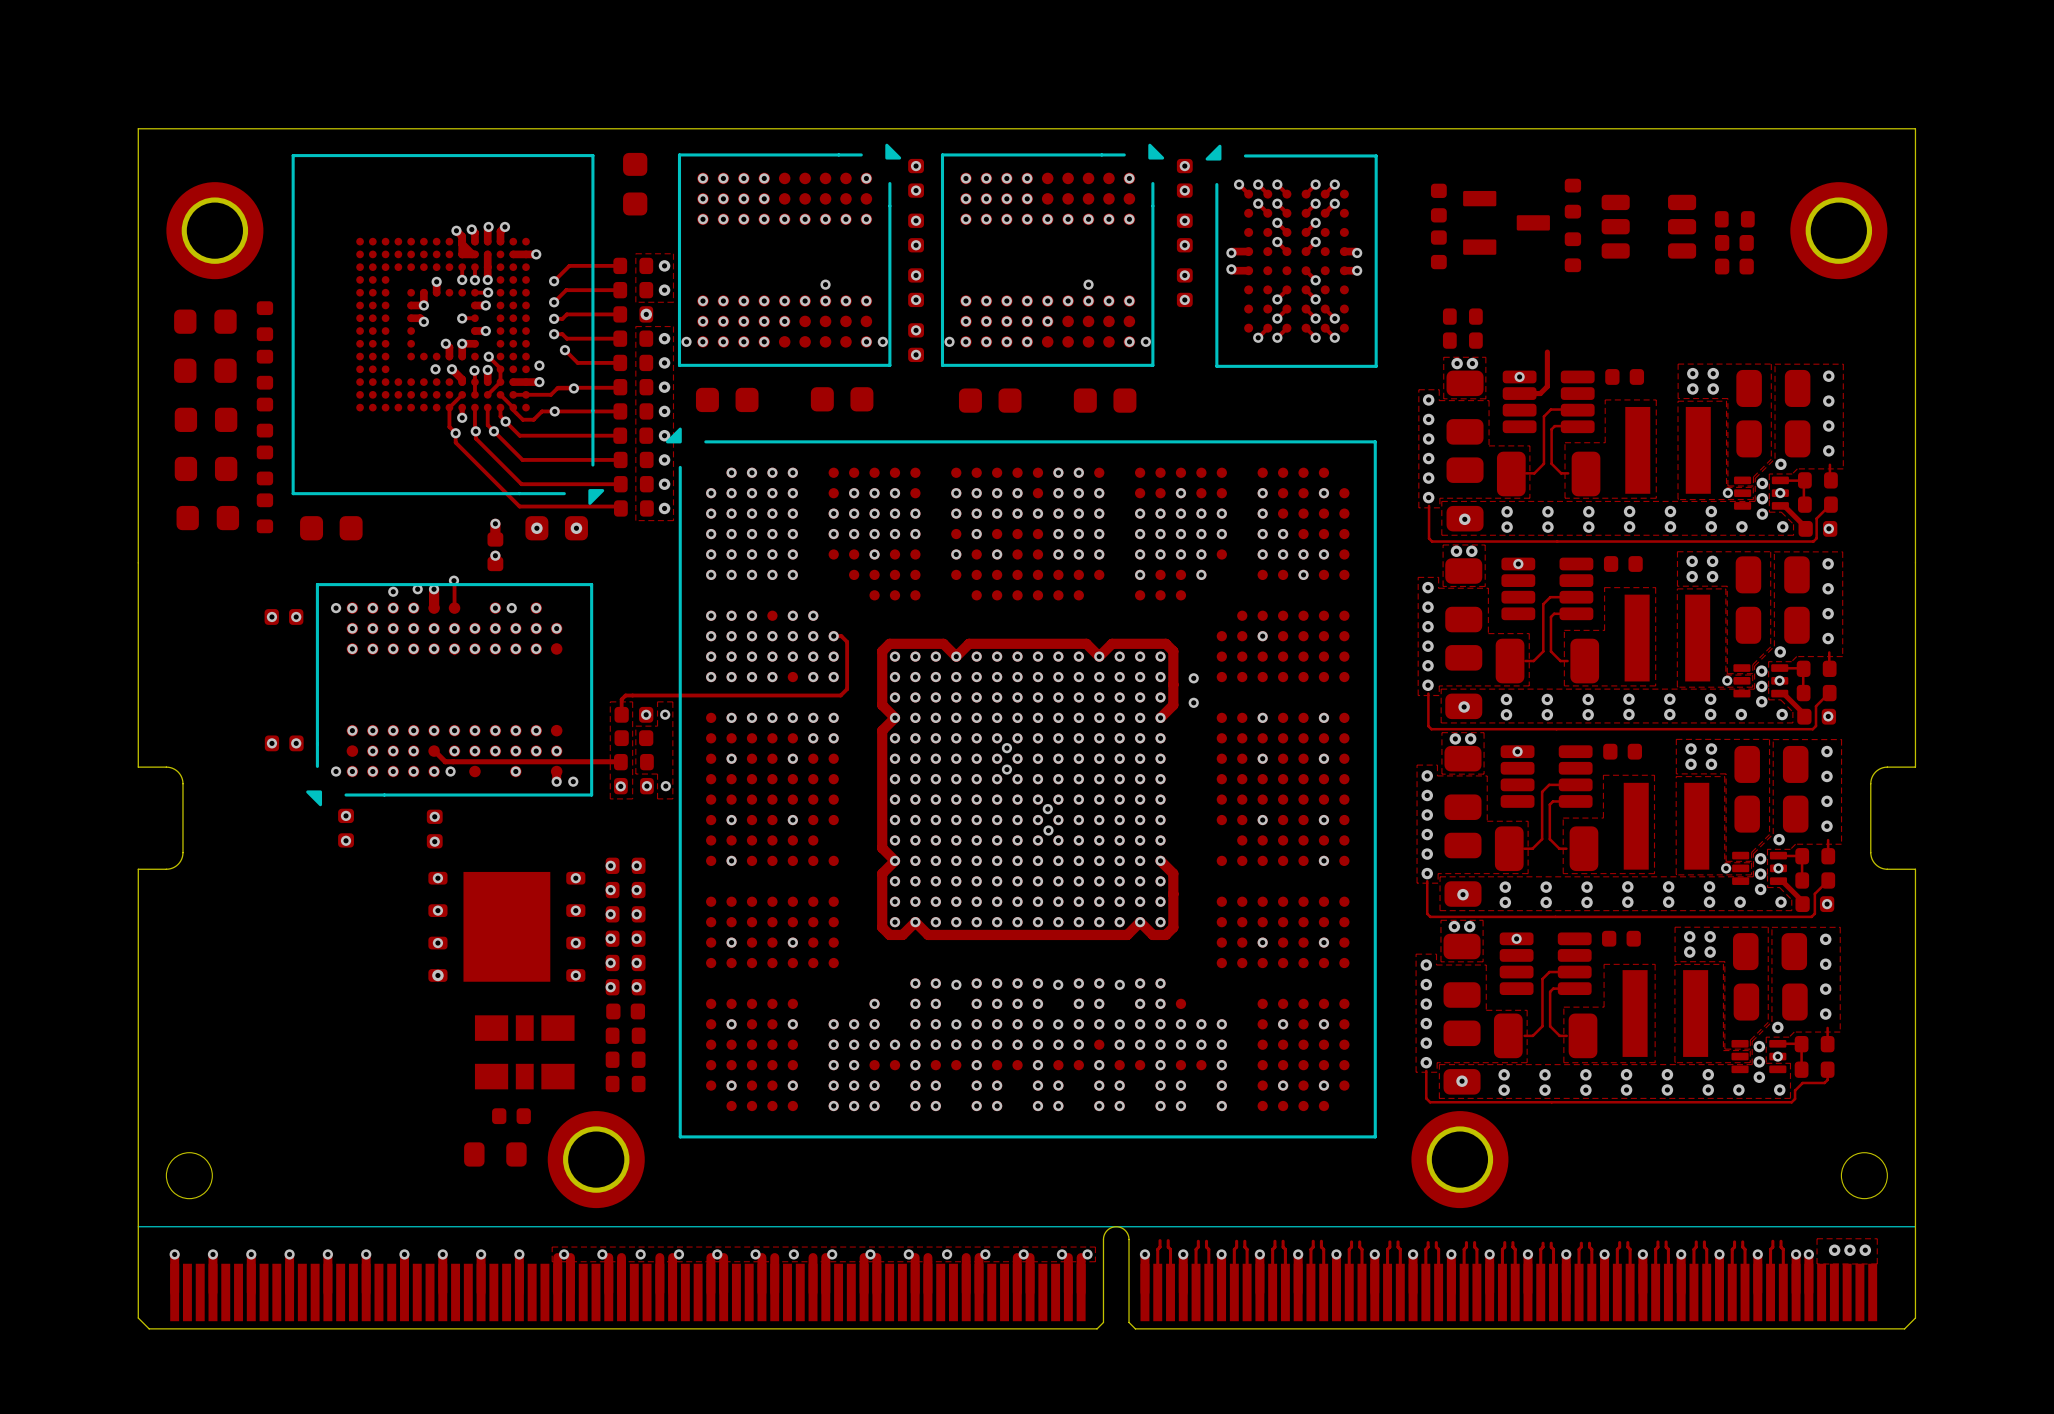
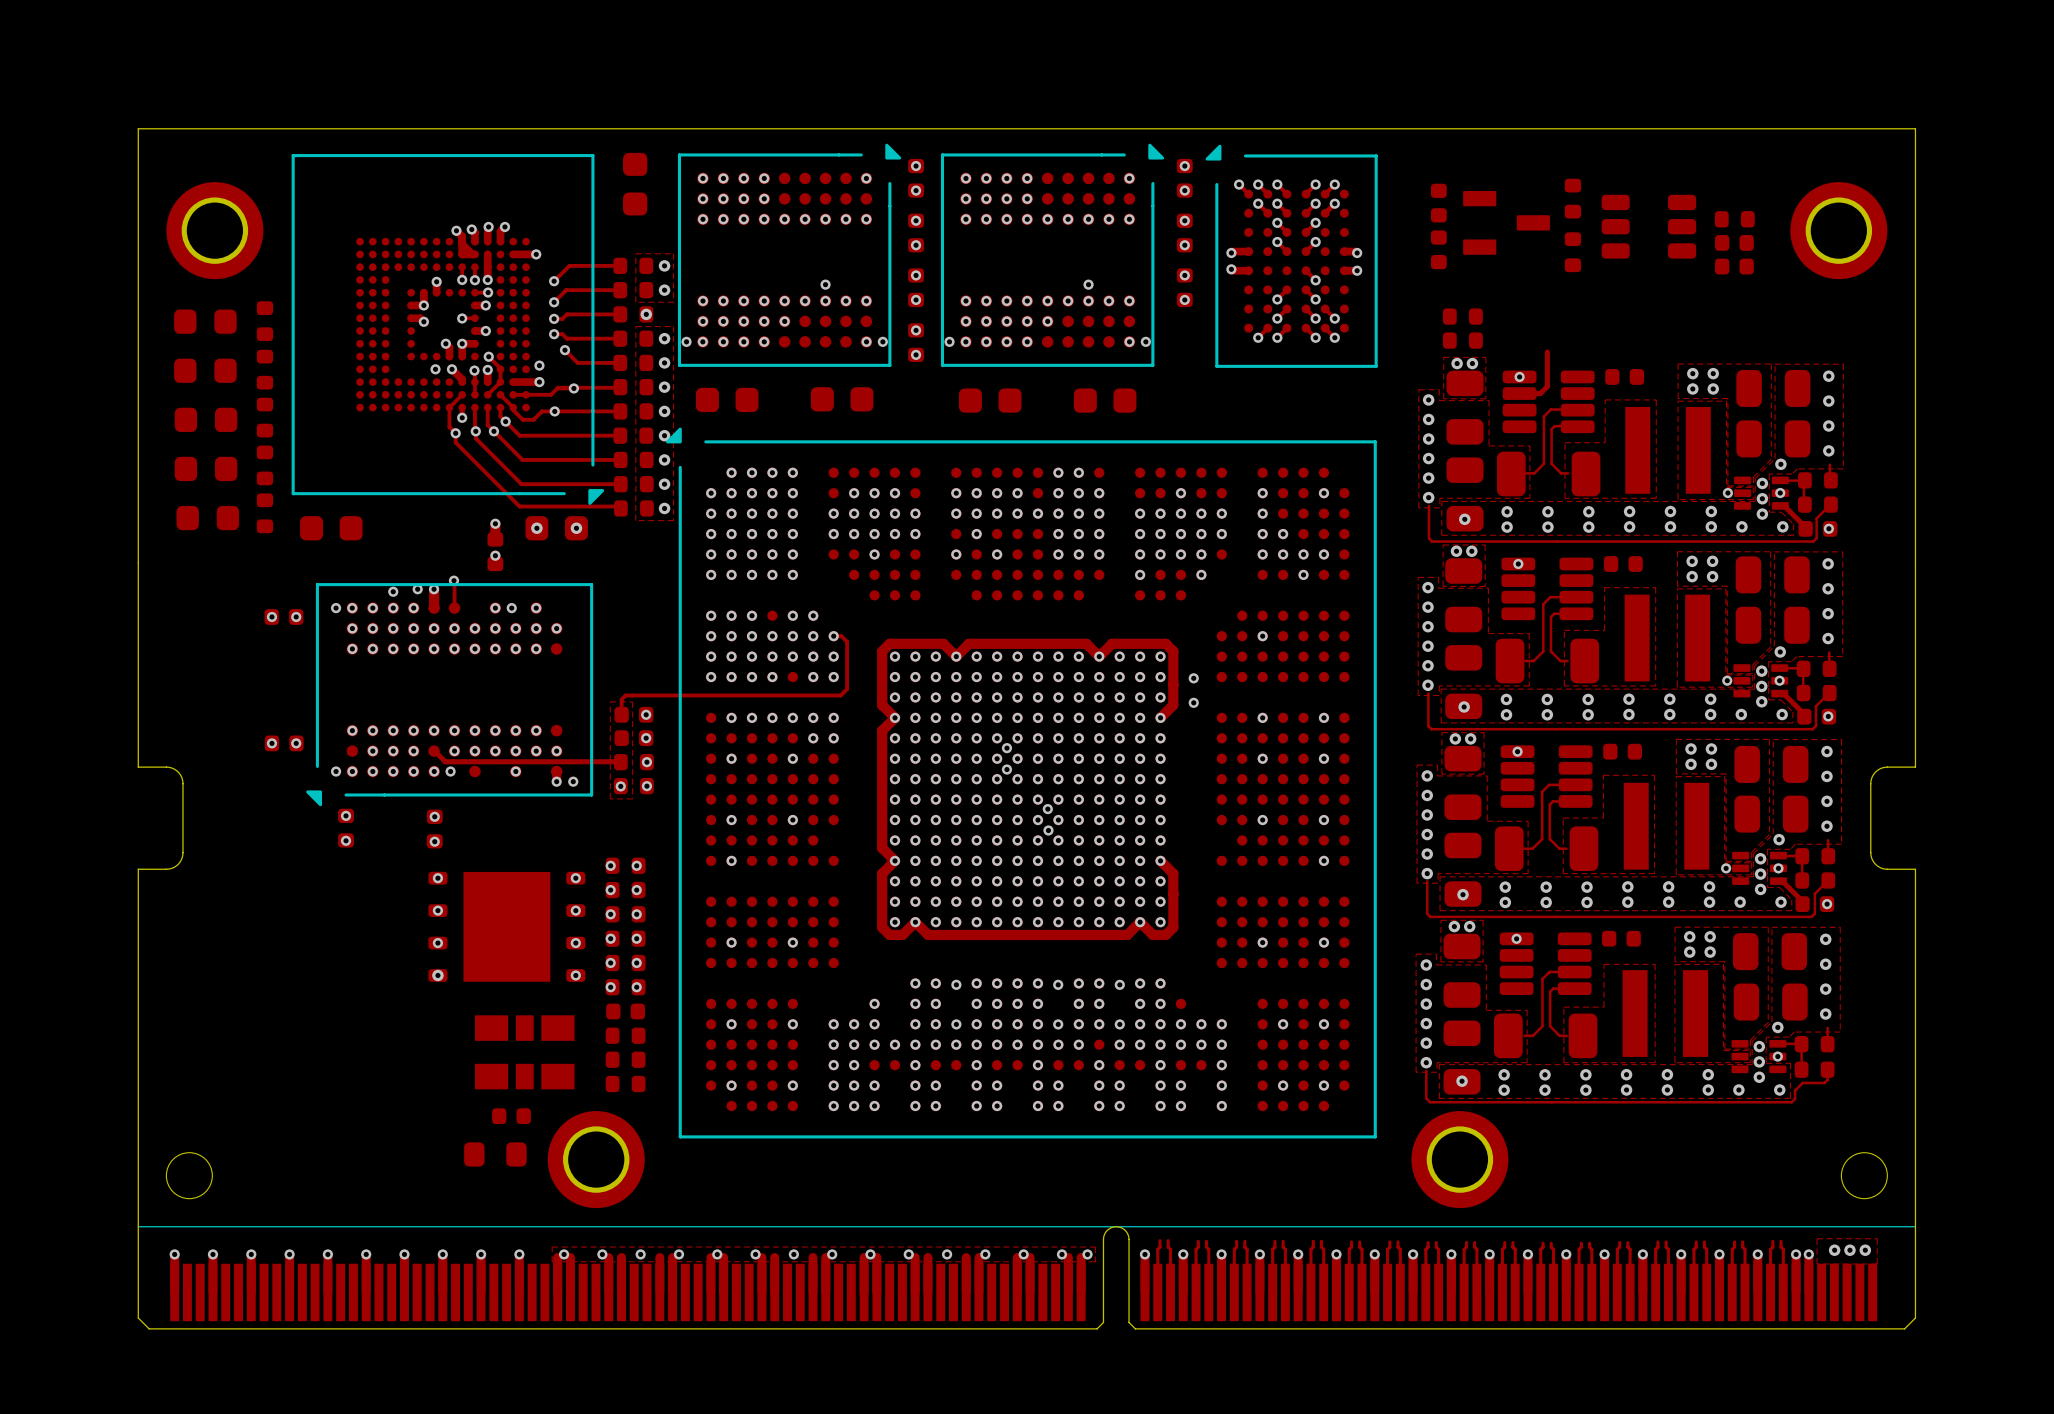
zone outline: (657, 701) (657, 726) (635, 726) (635, 774) (657, 774) (657, 798) (672, 798) (672, 701) (657, 701) -> none
via: (665, 714) -> none
via: none -> (646, 738)
via: none -> (646, 762)
via: (665, 786) -> none

